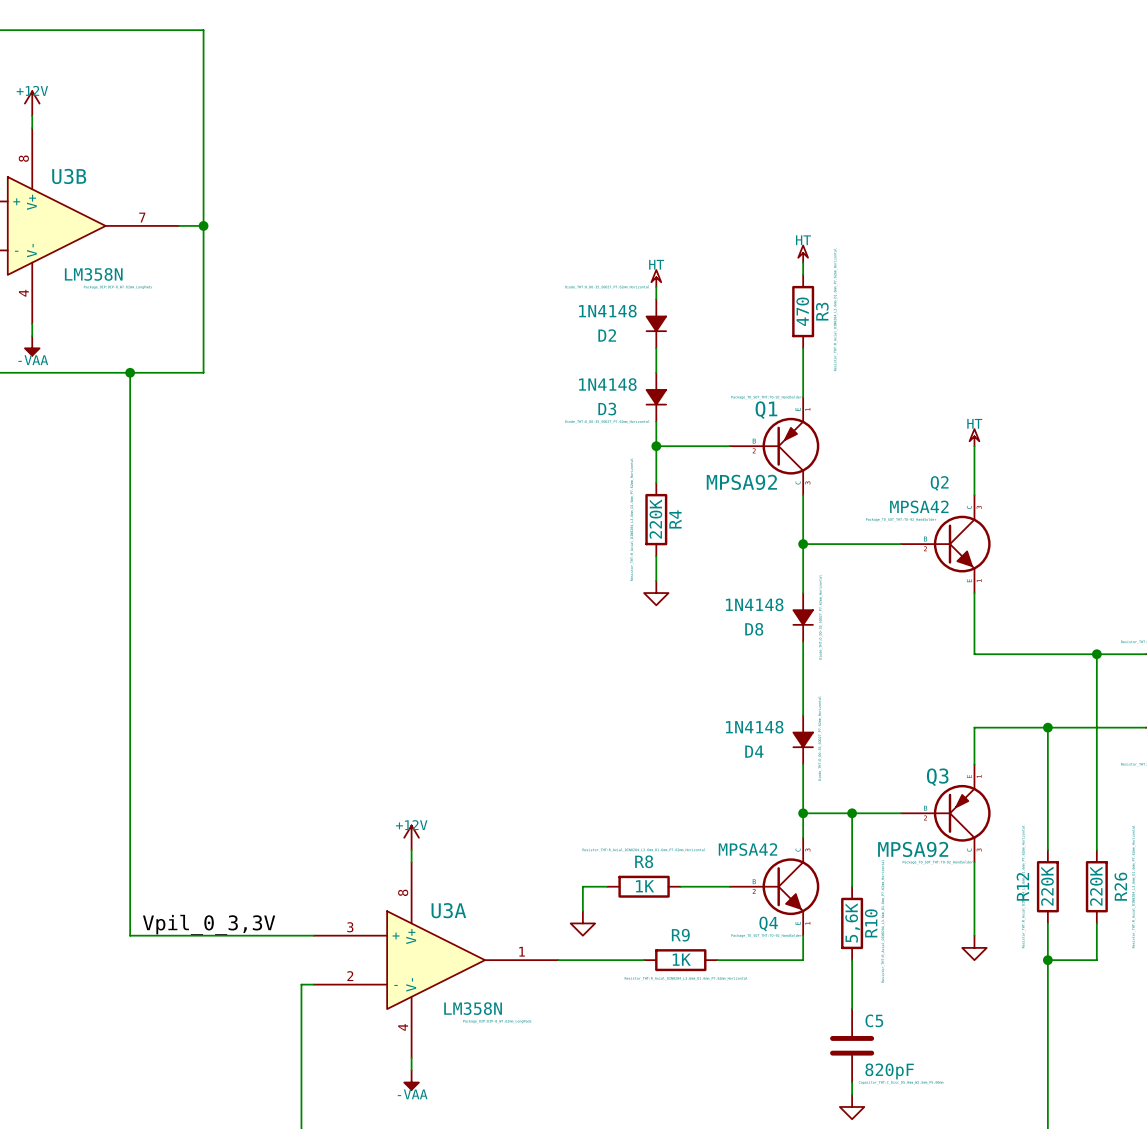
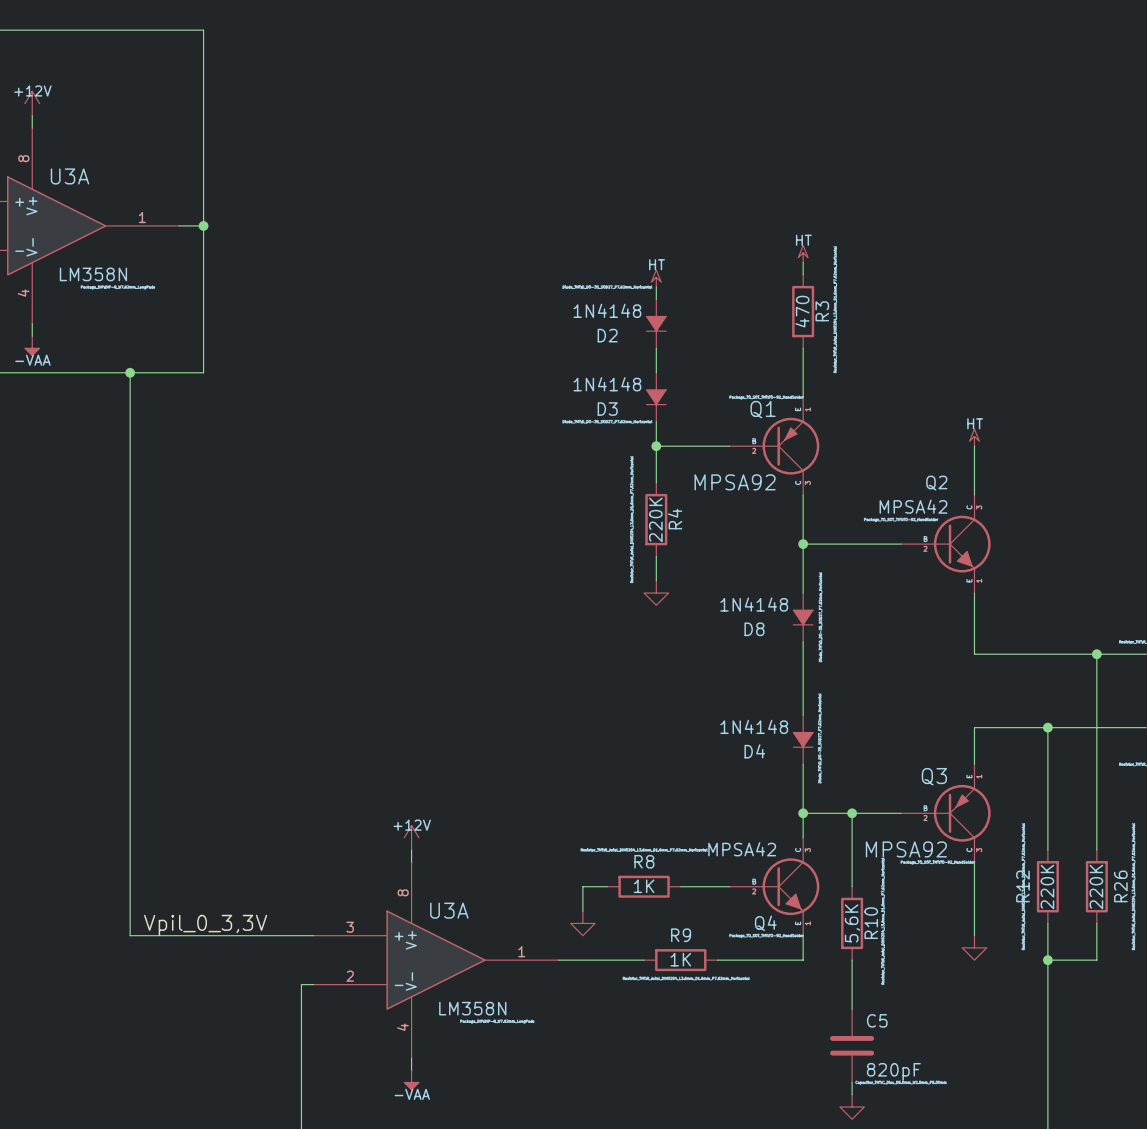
U3B name: U3B (69, 176) -> U3A (70, 176)
U3B pin number: 7 (142, 217) -> 1 (142, 217)

